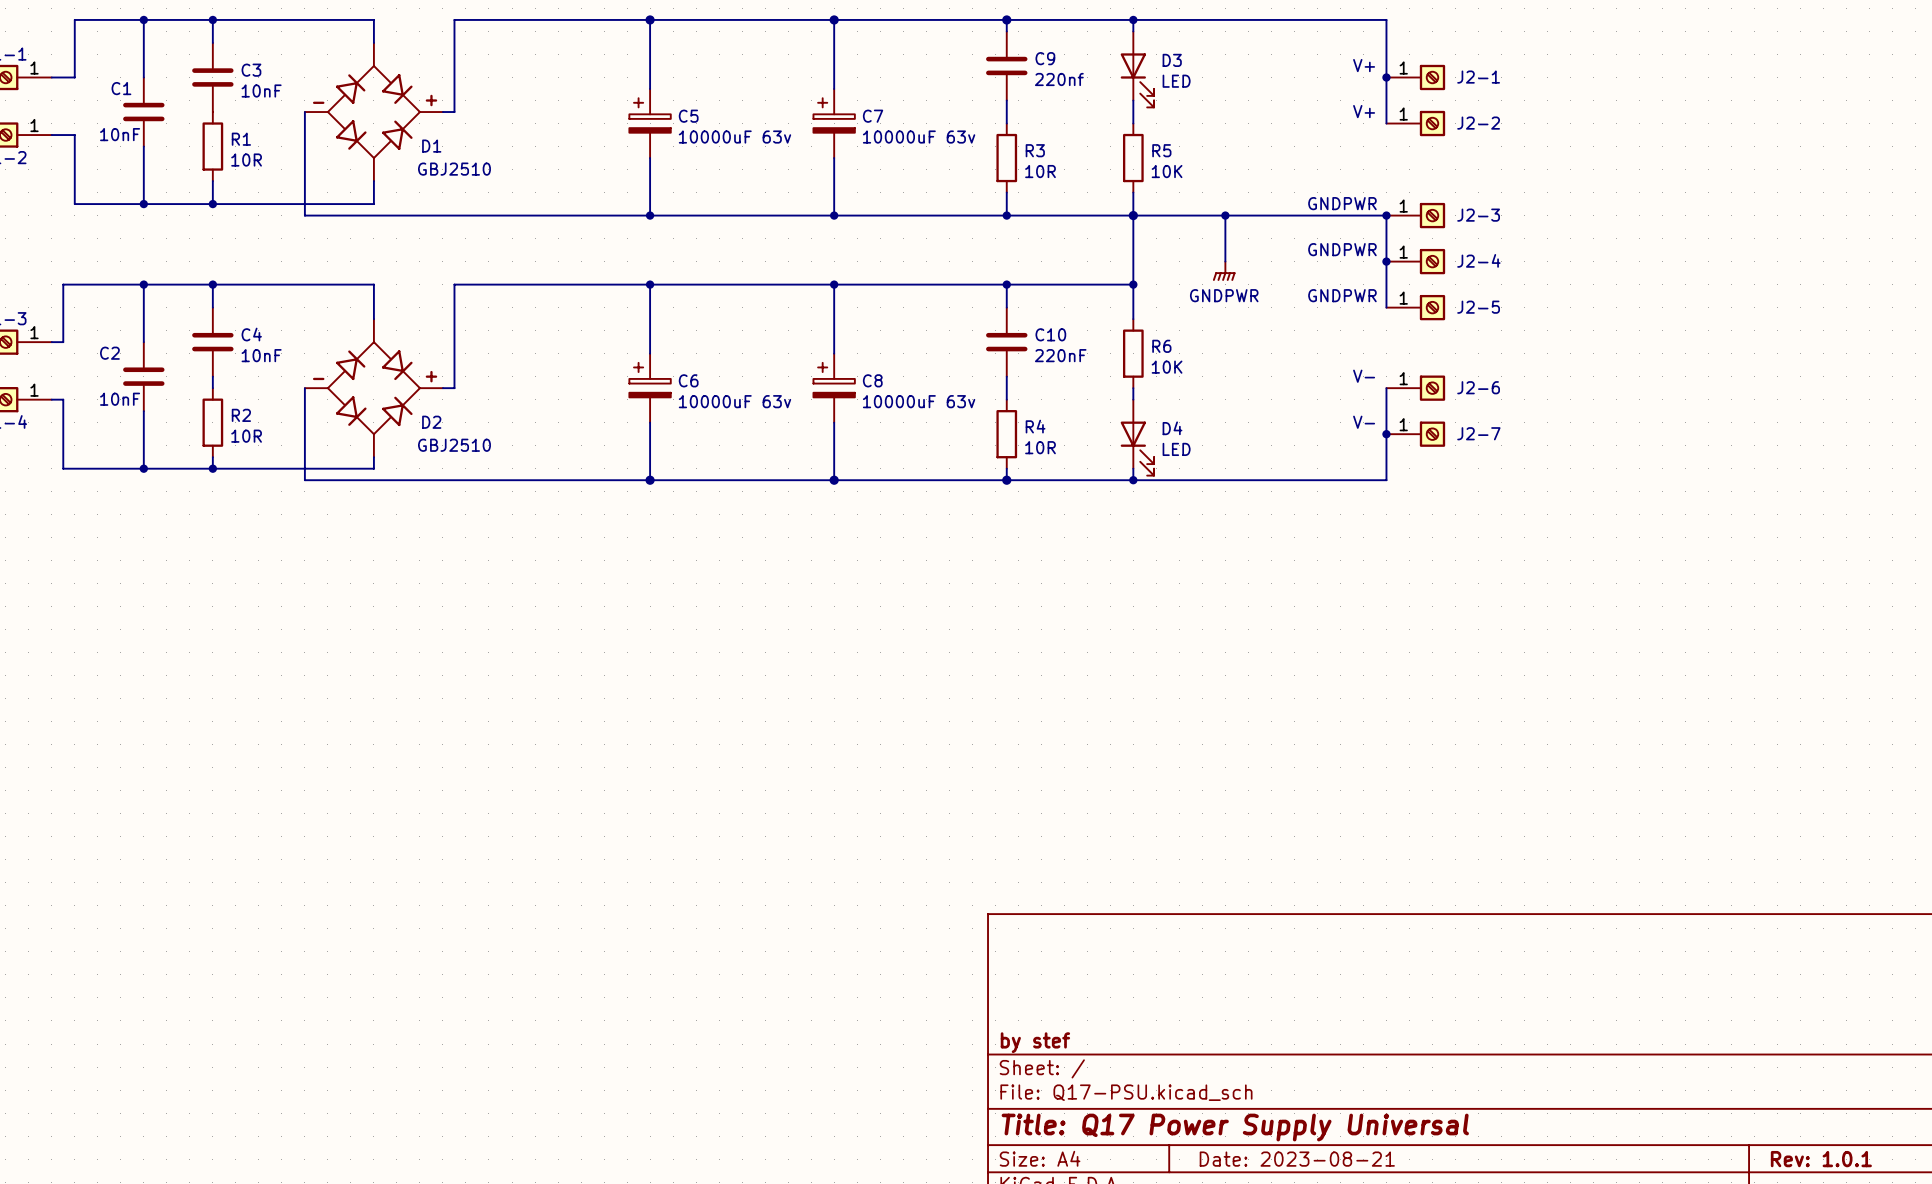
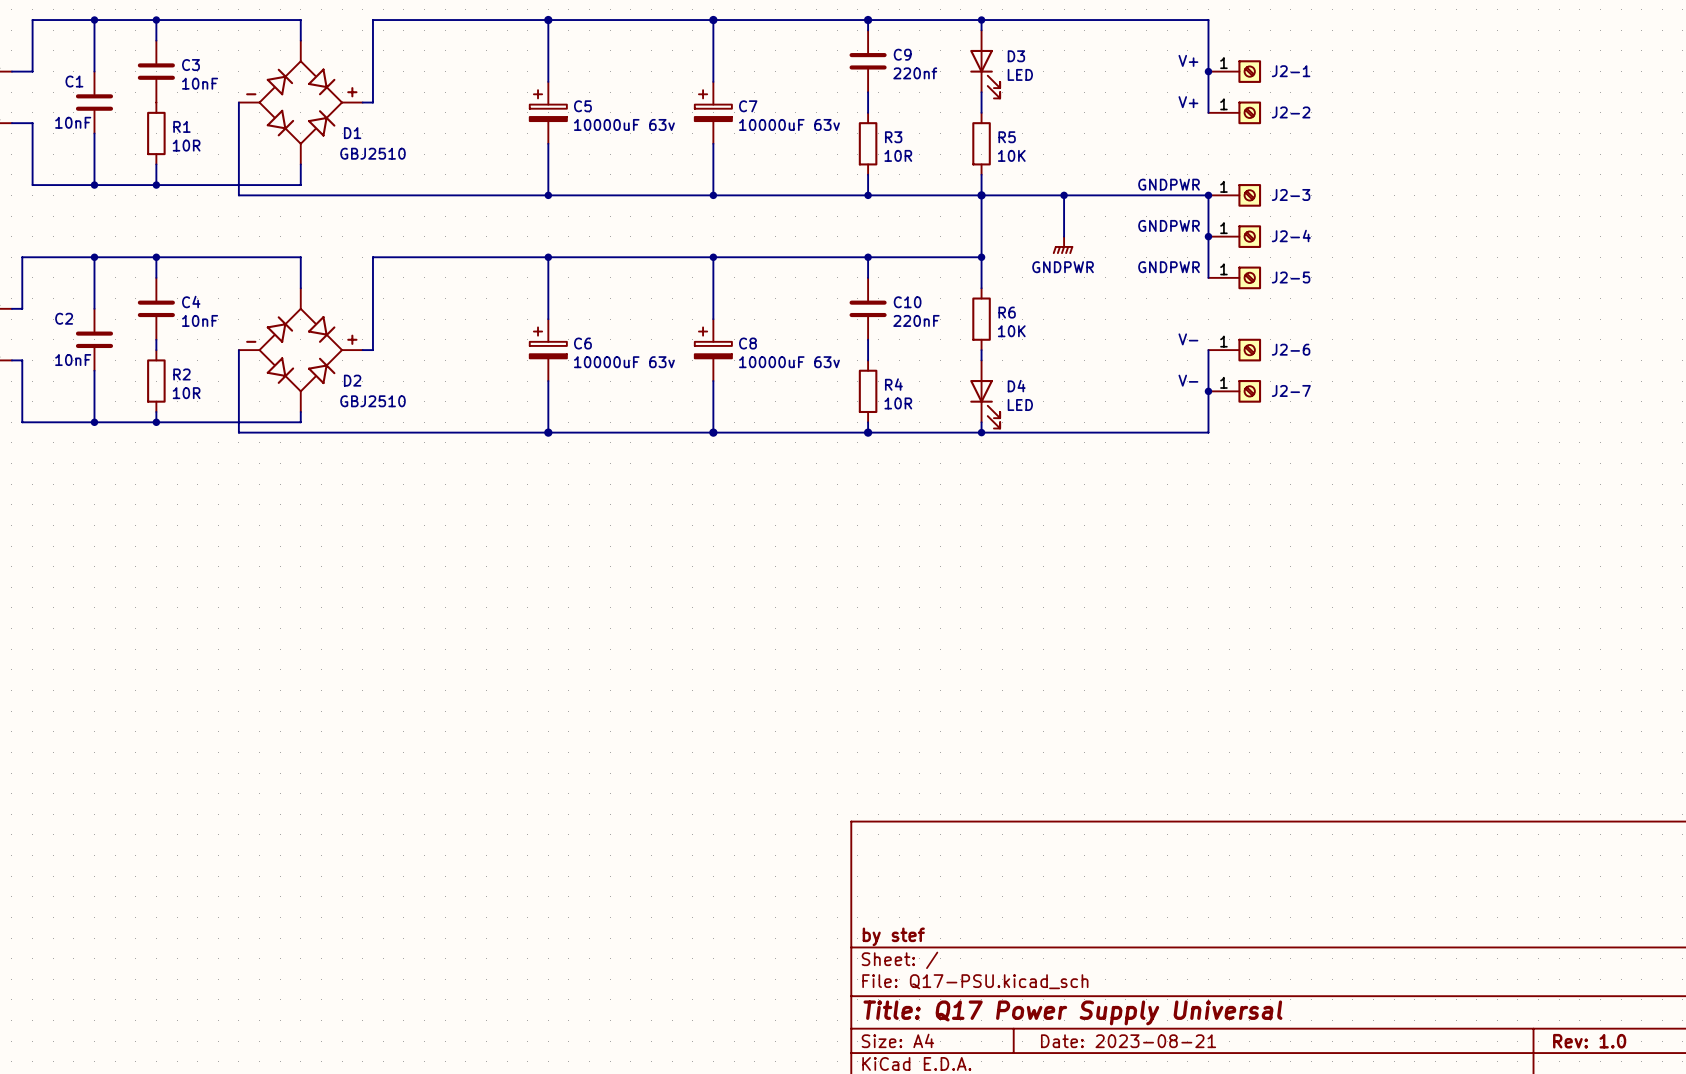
title block: Rev: 1.0.1 (1821, 1159) -> Rev: 1.0 (1589, 1041)

